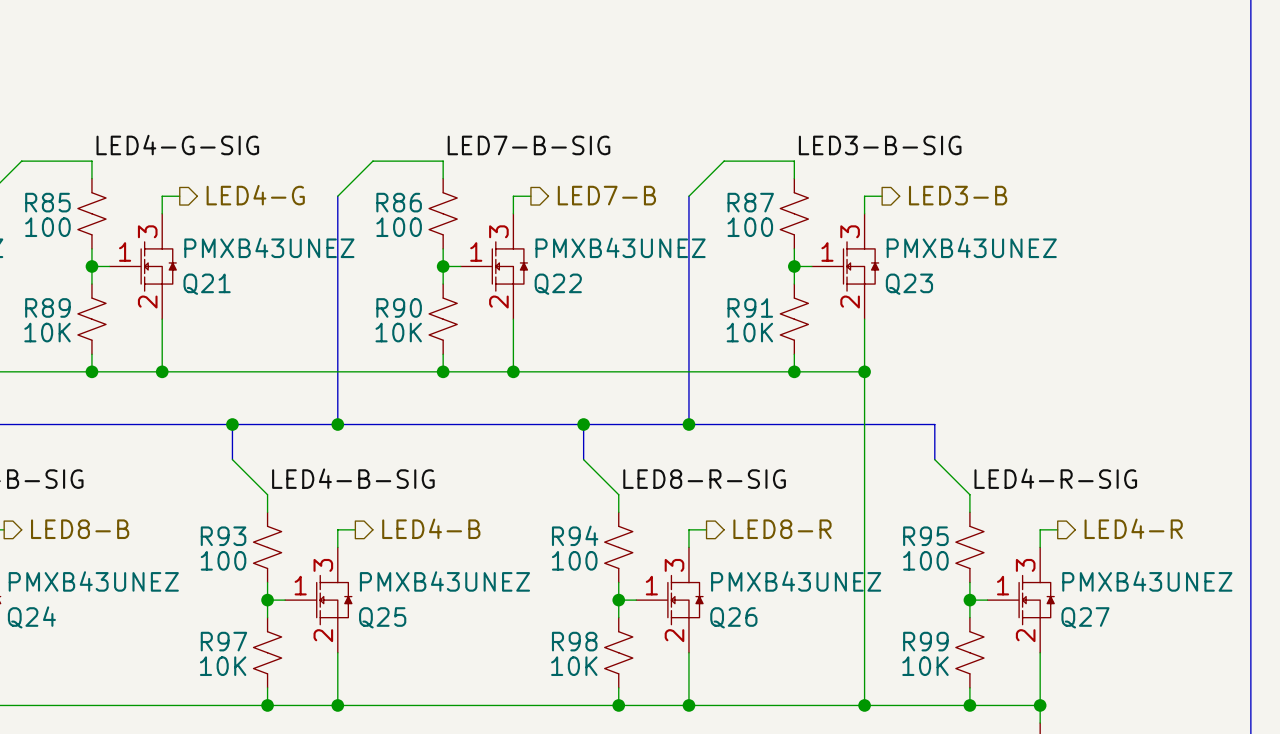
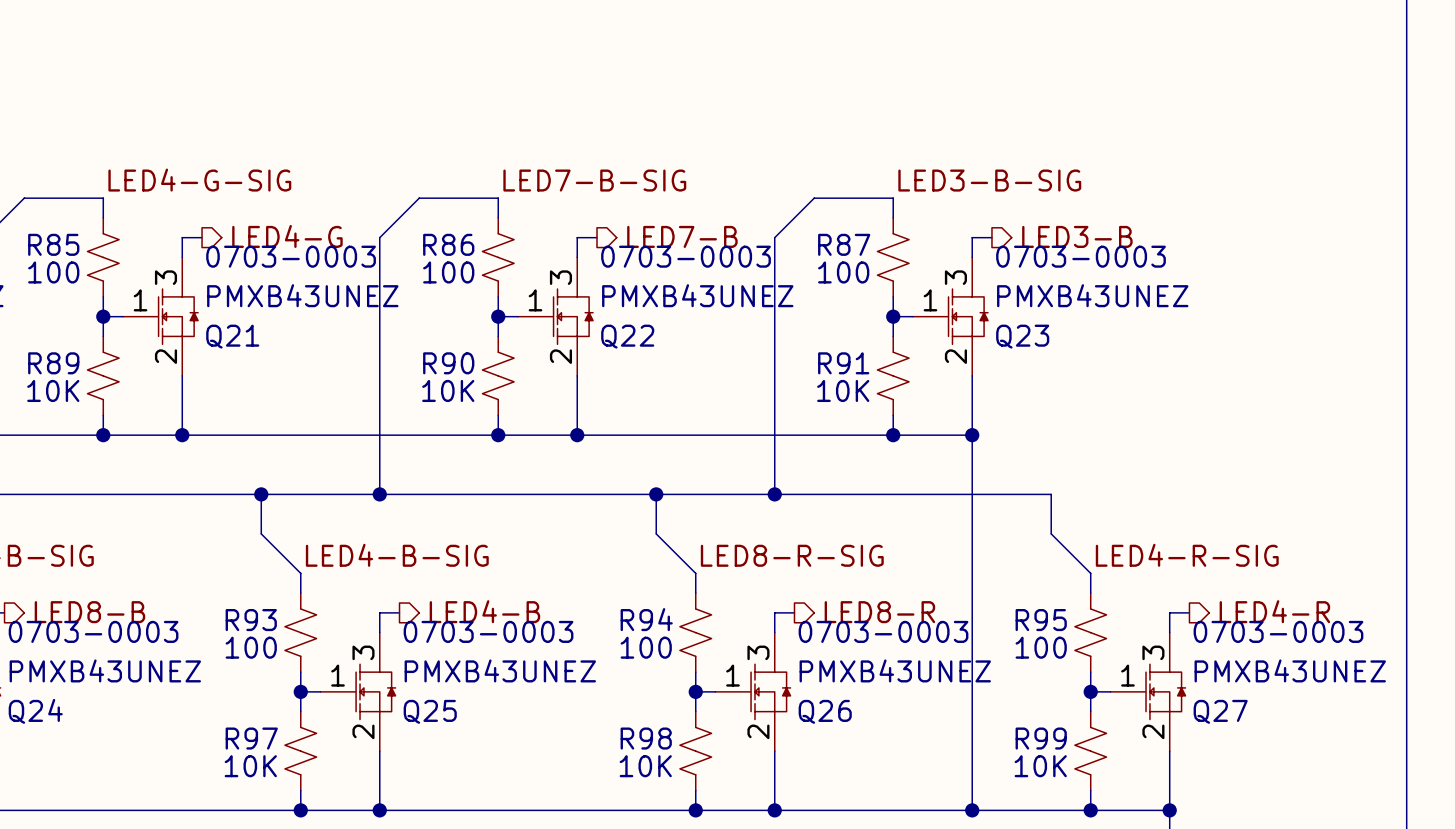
Q21 text: none -> 0703-0003 (291, 256)
Q22 text: none -> 0703-0003 (686, 256)
Q23 text: none -> 0703-0003 (1080, 256)
Q24 text: none -> 0703-0003 (93, 631)
Q25 text: none -> 0703-0003 (488, 631)
Q26 text: none -> 0703-0003 (883, 631)
Q27 text: none -> 0703-0003 (1278, 631)

